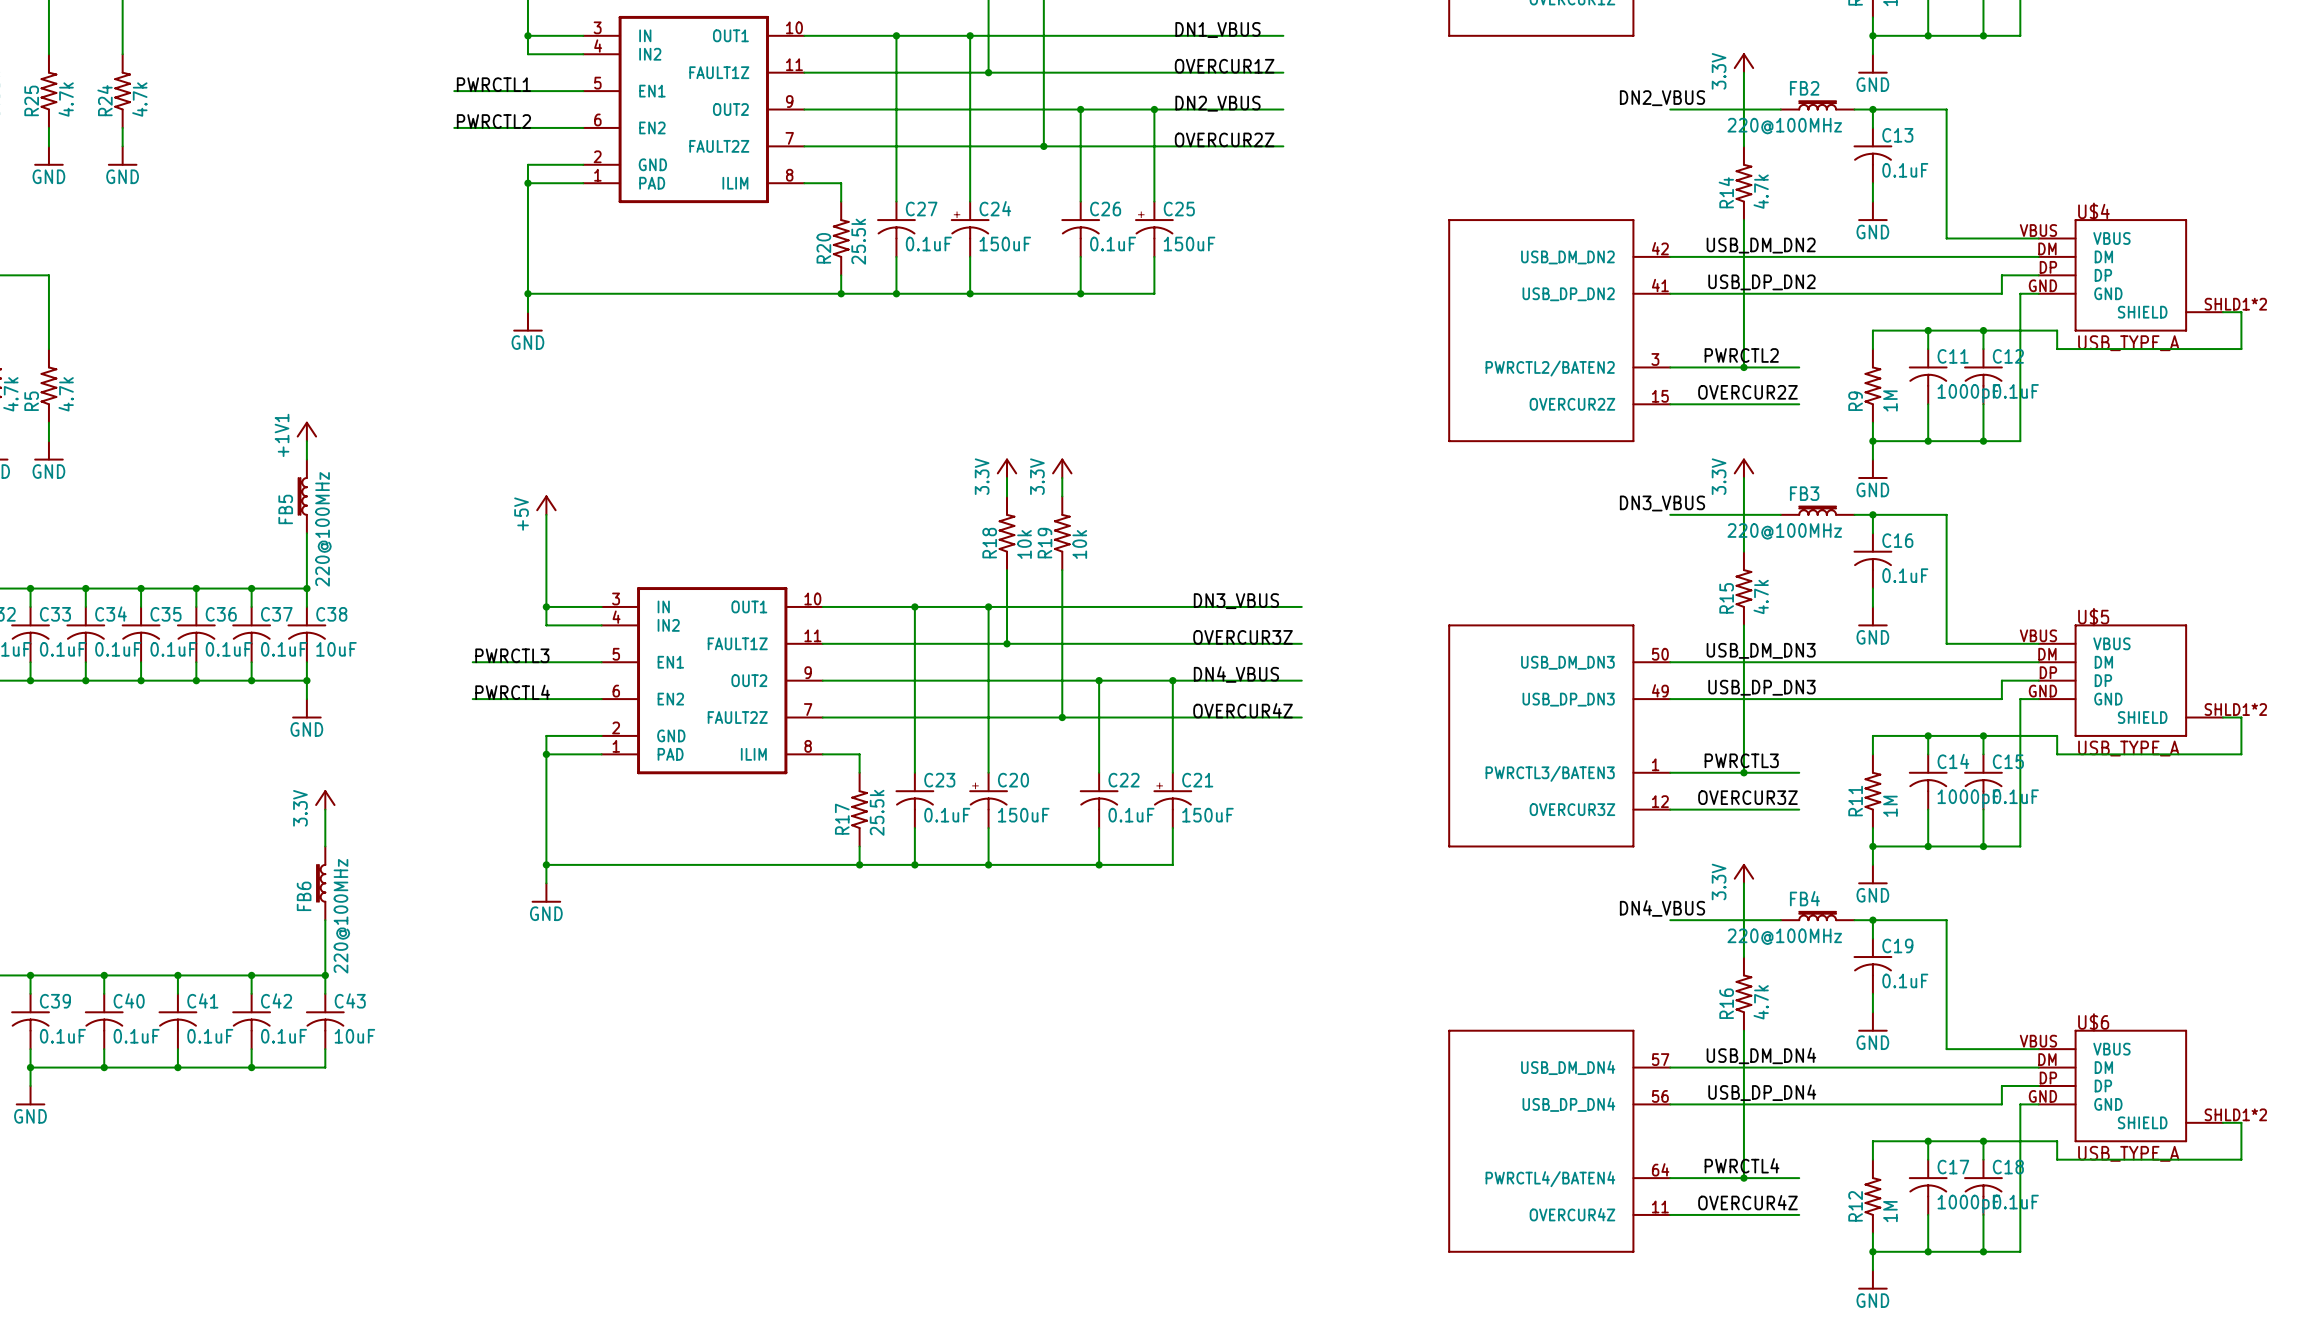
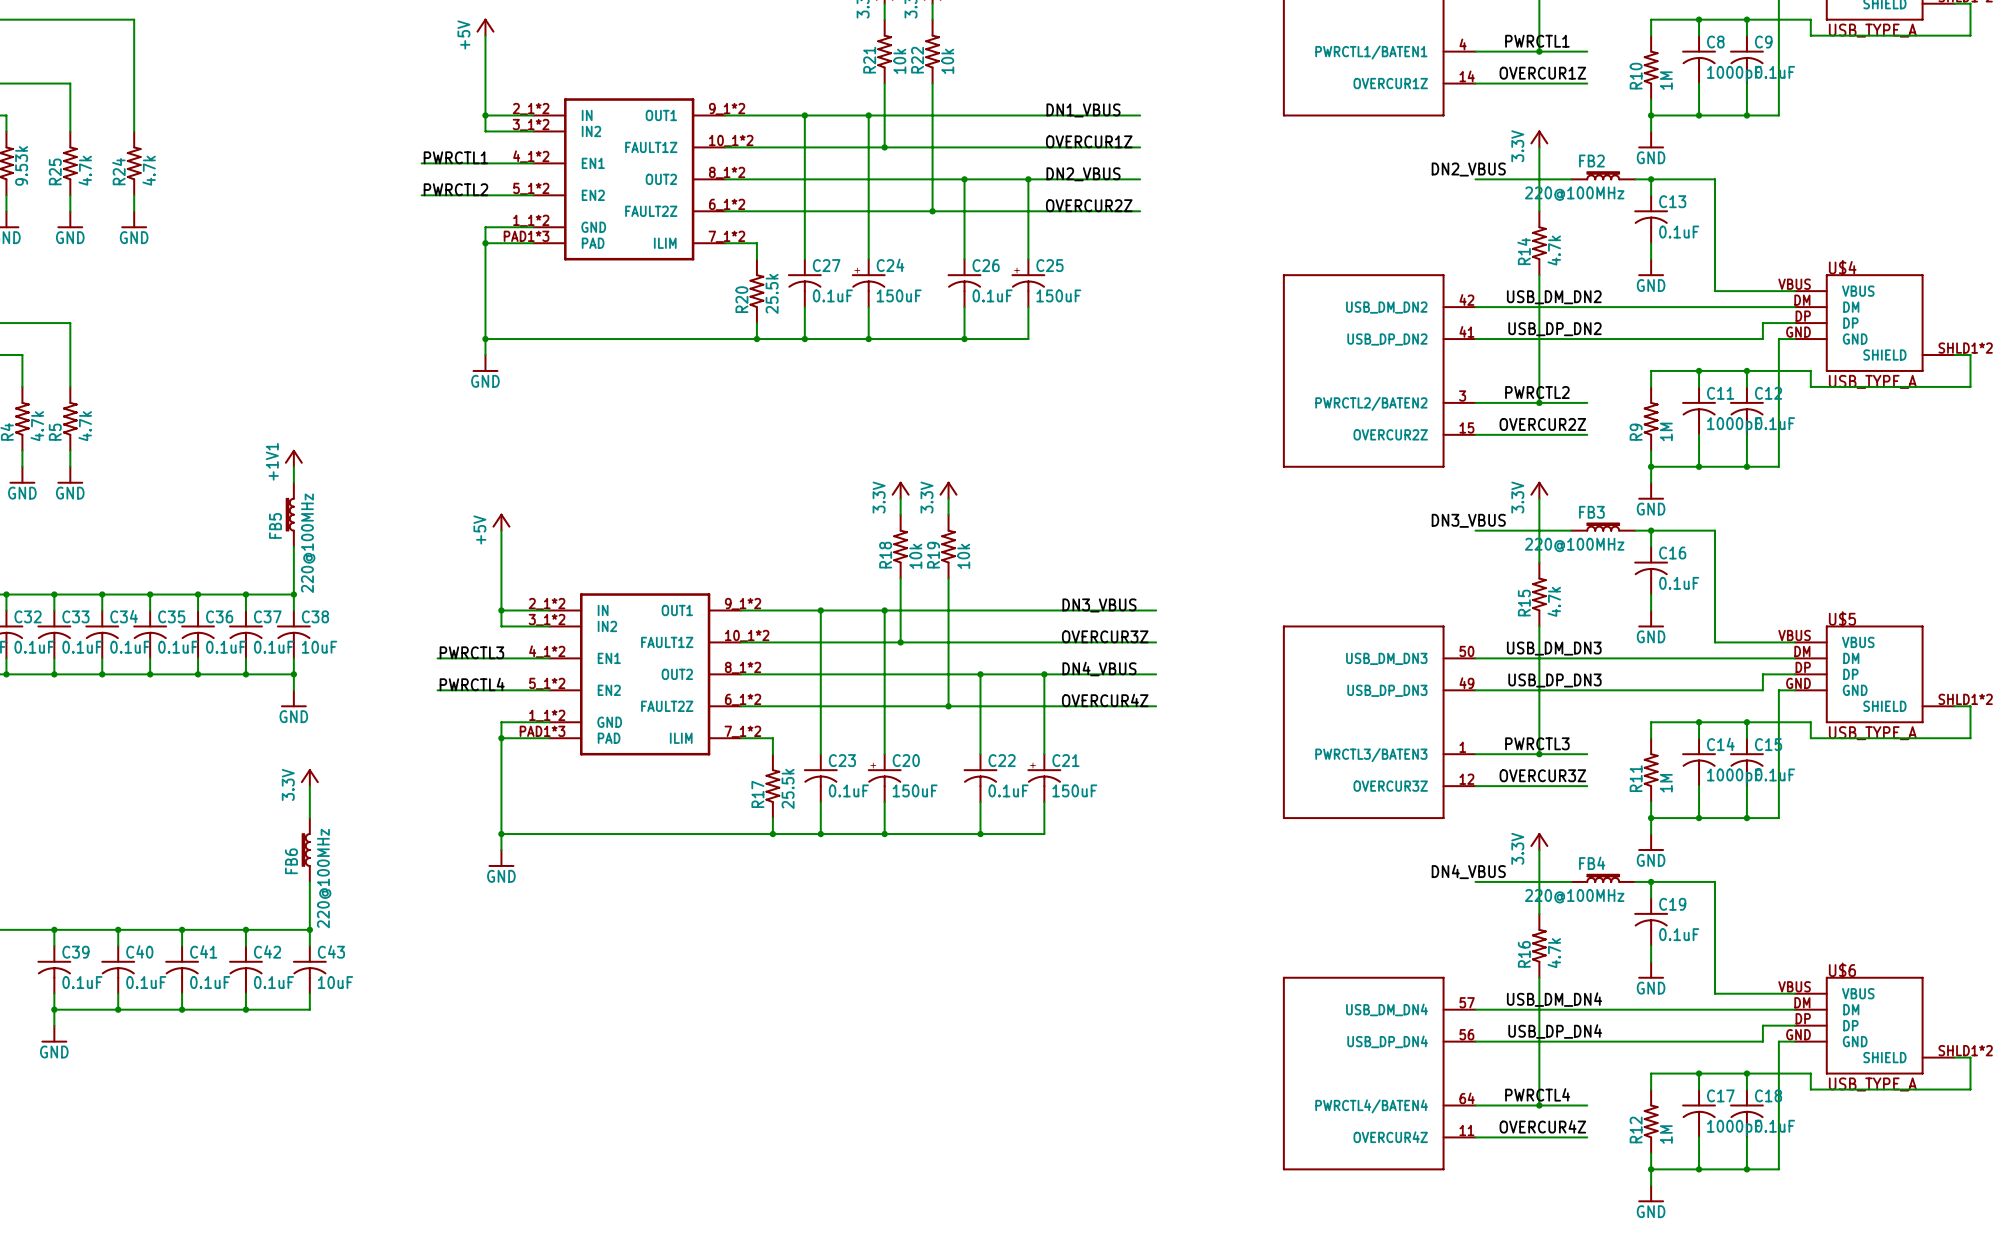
part symbol: [583, 15, 805, 204] -> [533, 98, 725, 261]
part symbol: [601, 587, 823, 775] -> [549, 593, 741, 756]

